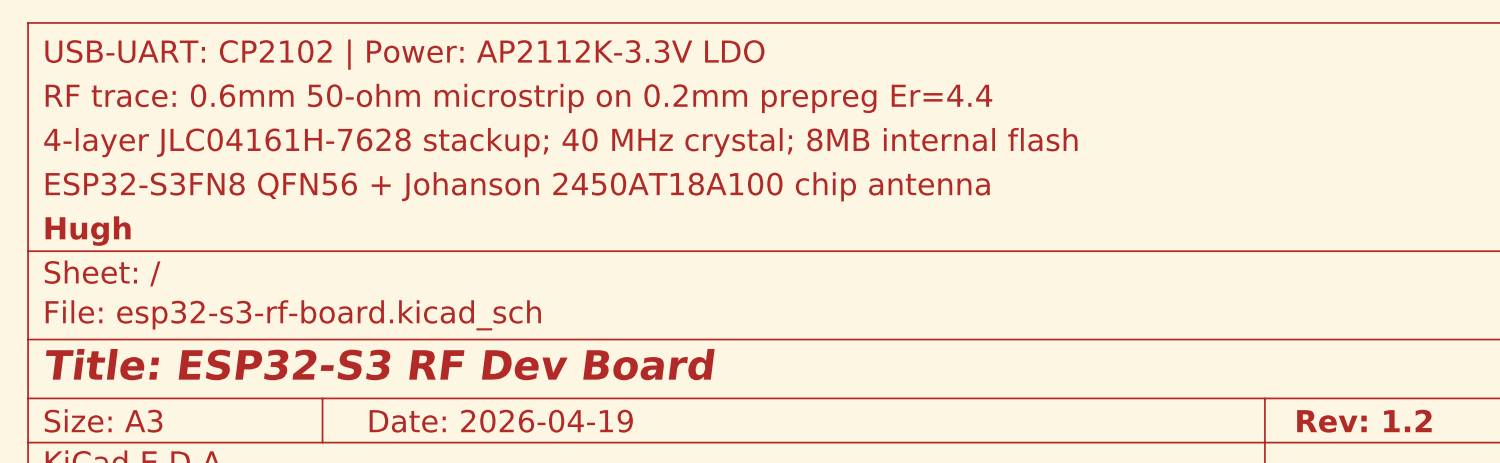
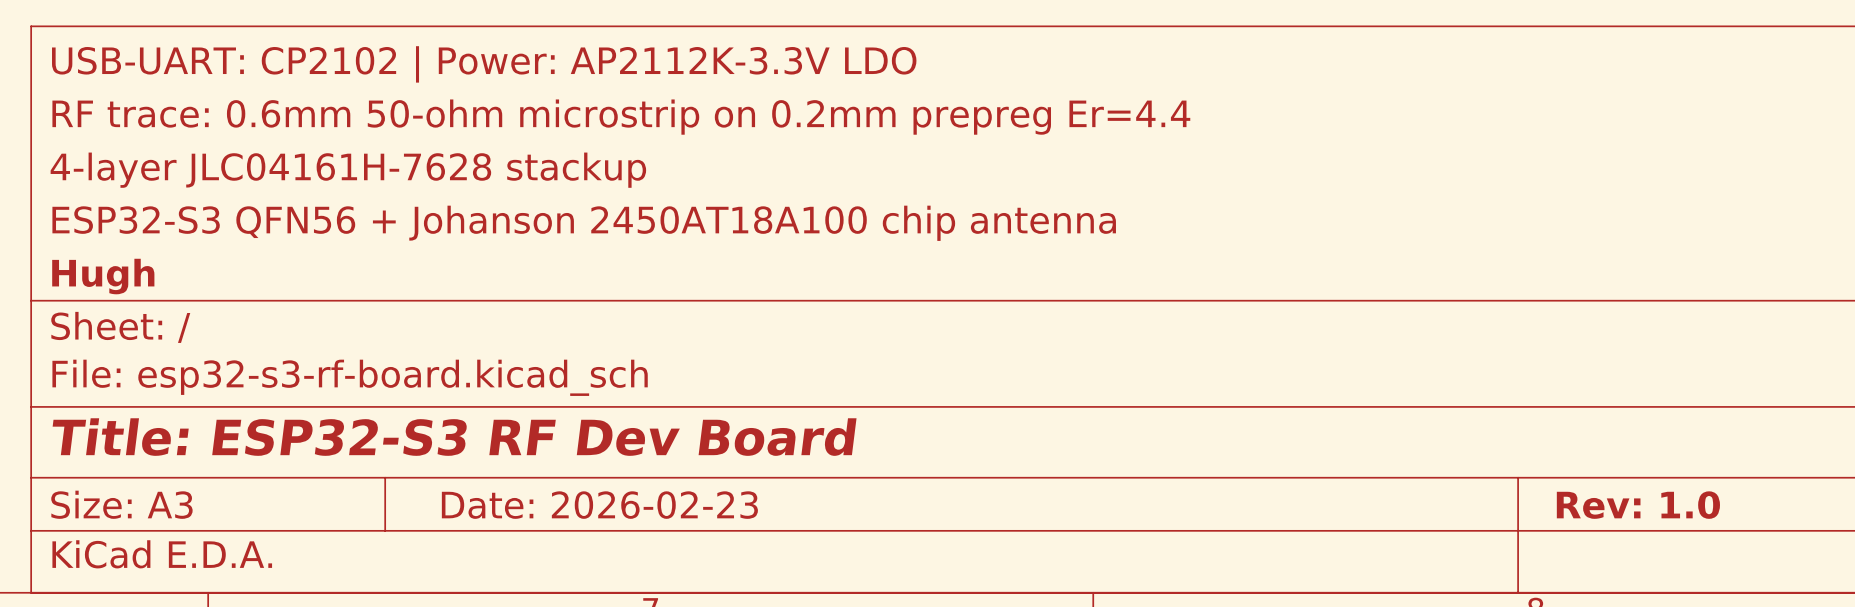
title block: 4-layer JLC04161H-7628 stackup; 40 MHz crystal; 8MB internal flash (560, 142) -> 4-layer JLC04161H-7628 stackup (348, 170)
title block: ESP32-S3FN8 QFN56 + Johanson 2450AT18A100 chip antenna (517, 186) -> ESP32-S3 QFN56 + Johanson 2450AT18A100 chip antenna (584, 223)
title block: Date: 2026-04-19 (501, 421) -> Date: 2026-02-23 (599, 505)
title block: Rev: 1.2 (1364, 421) -> Rev: 1.0 (1638, 505)

